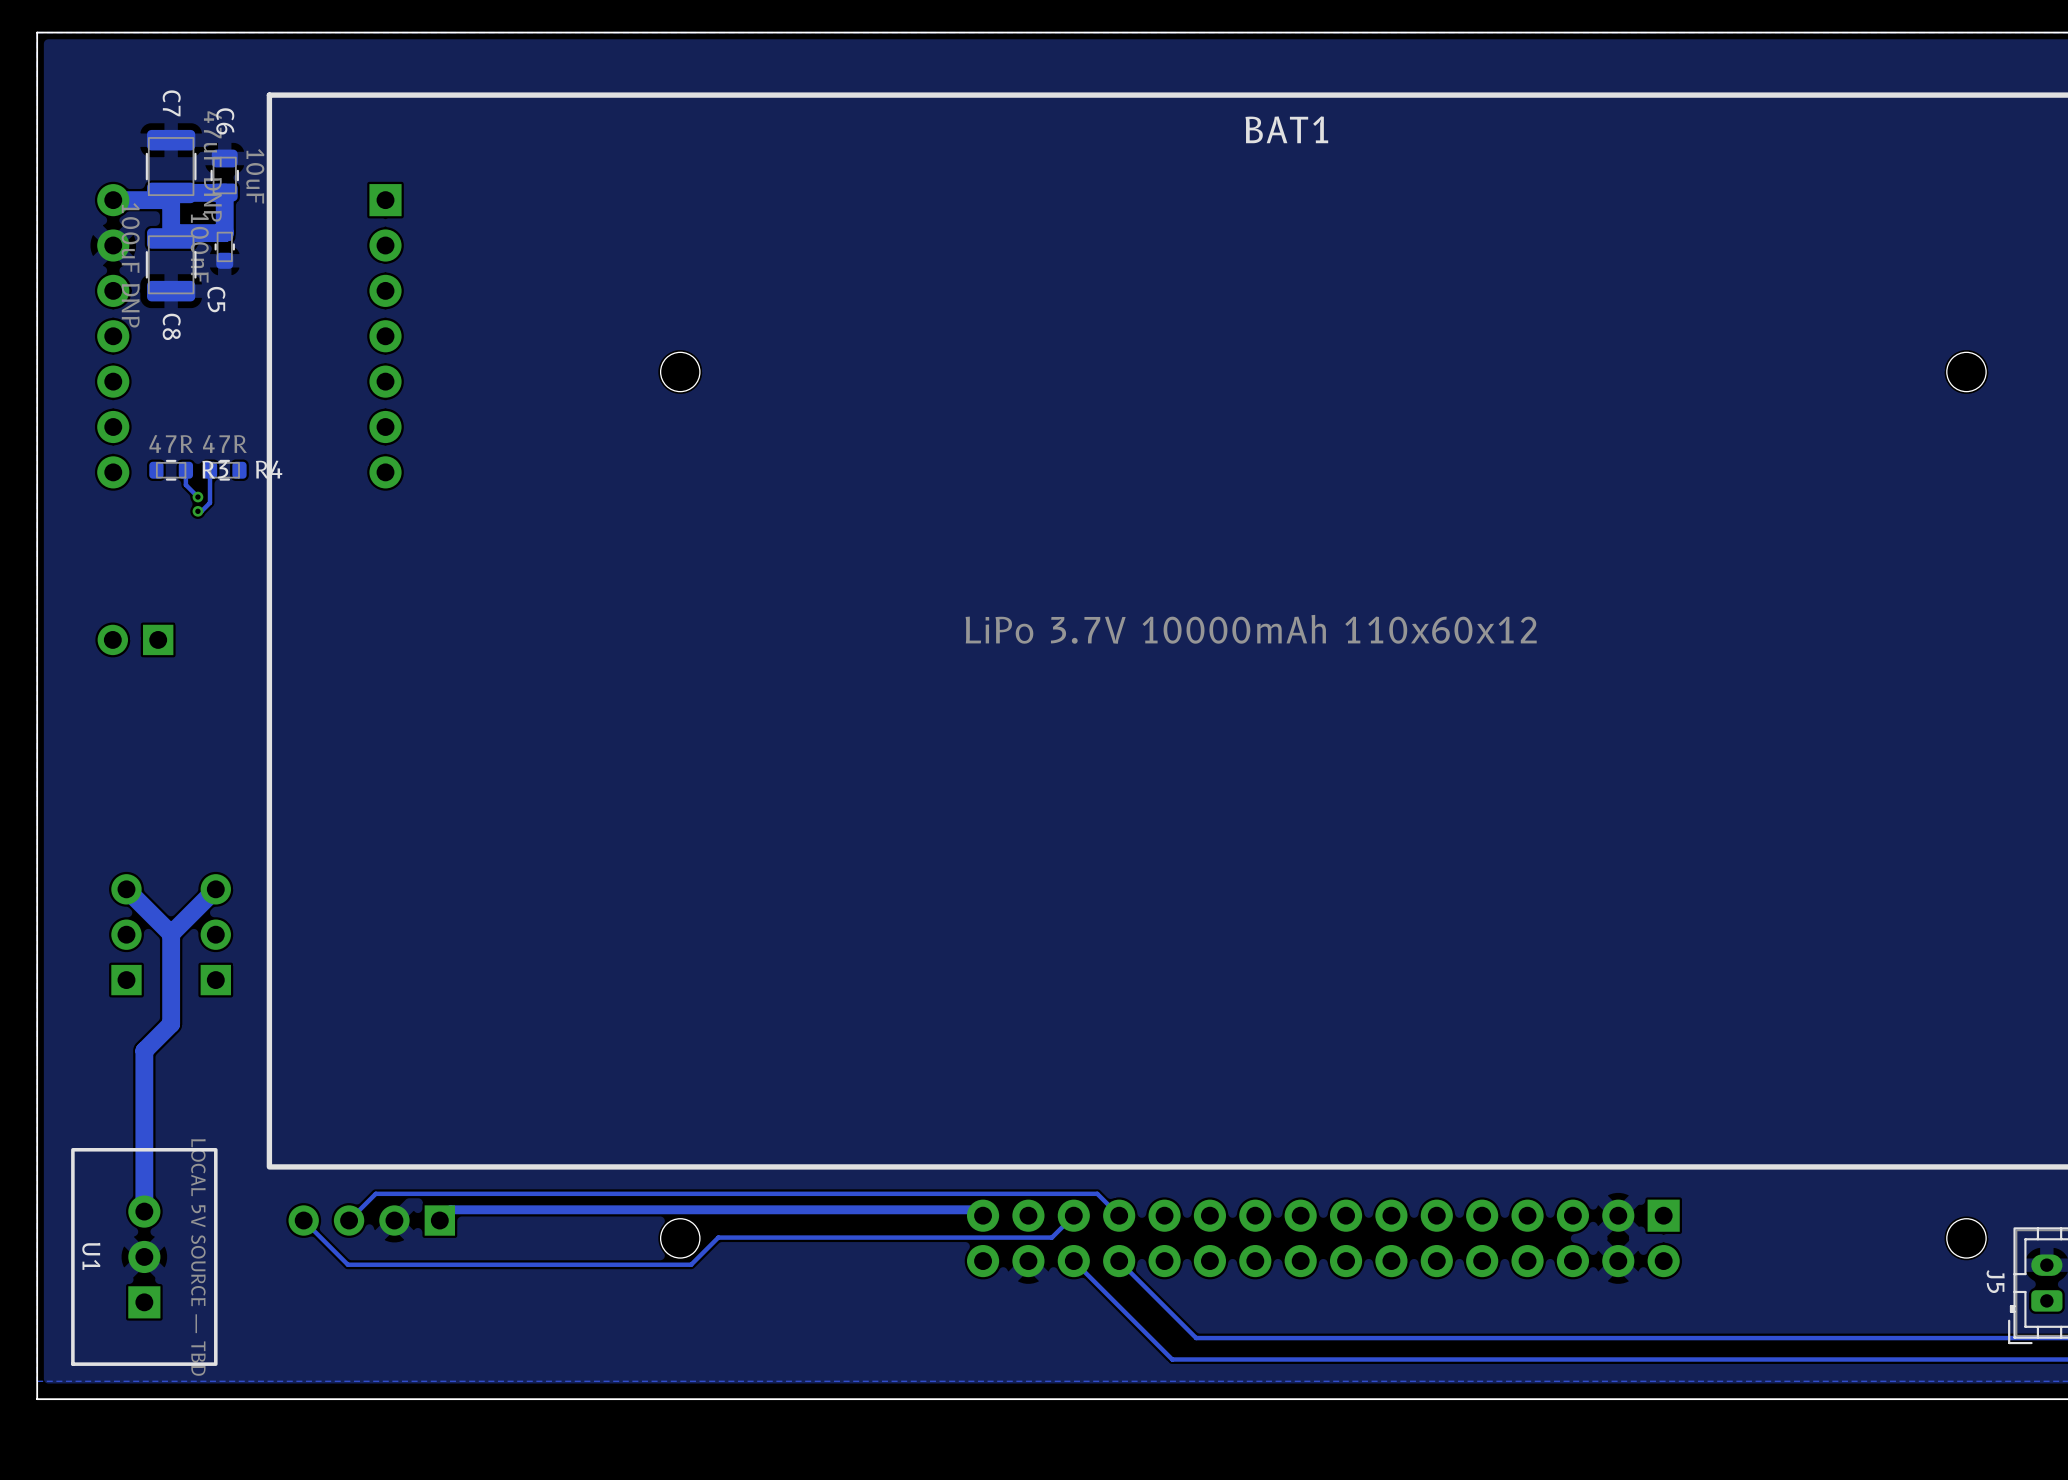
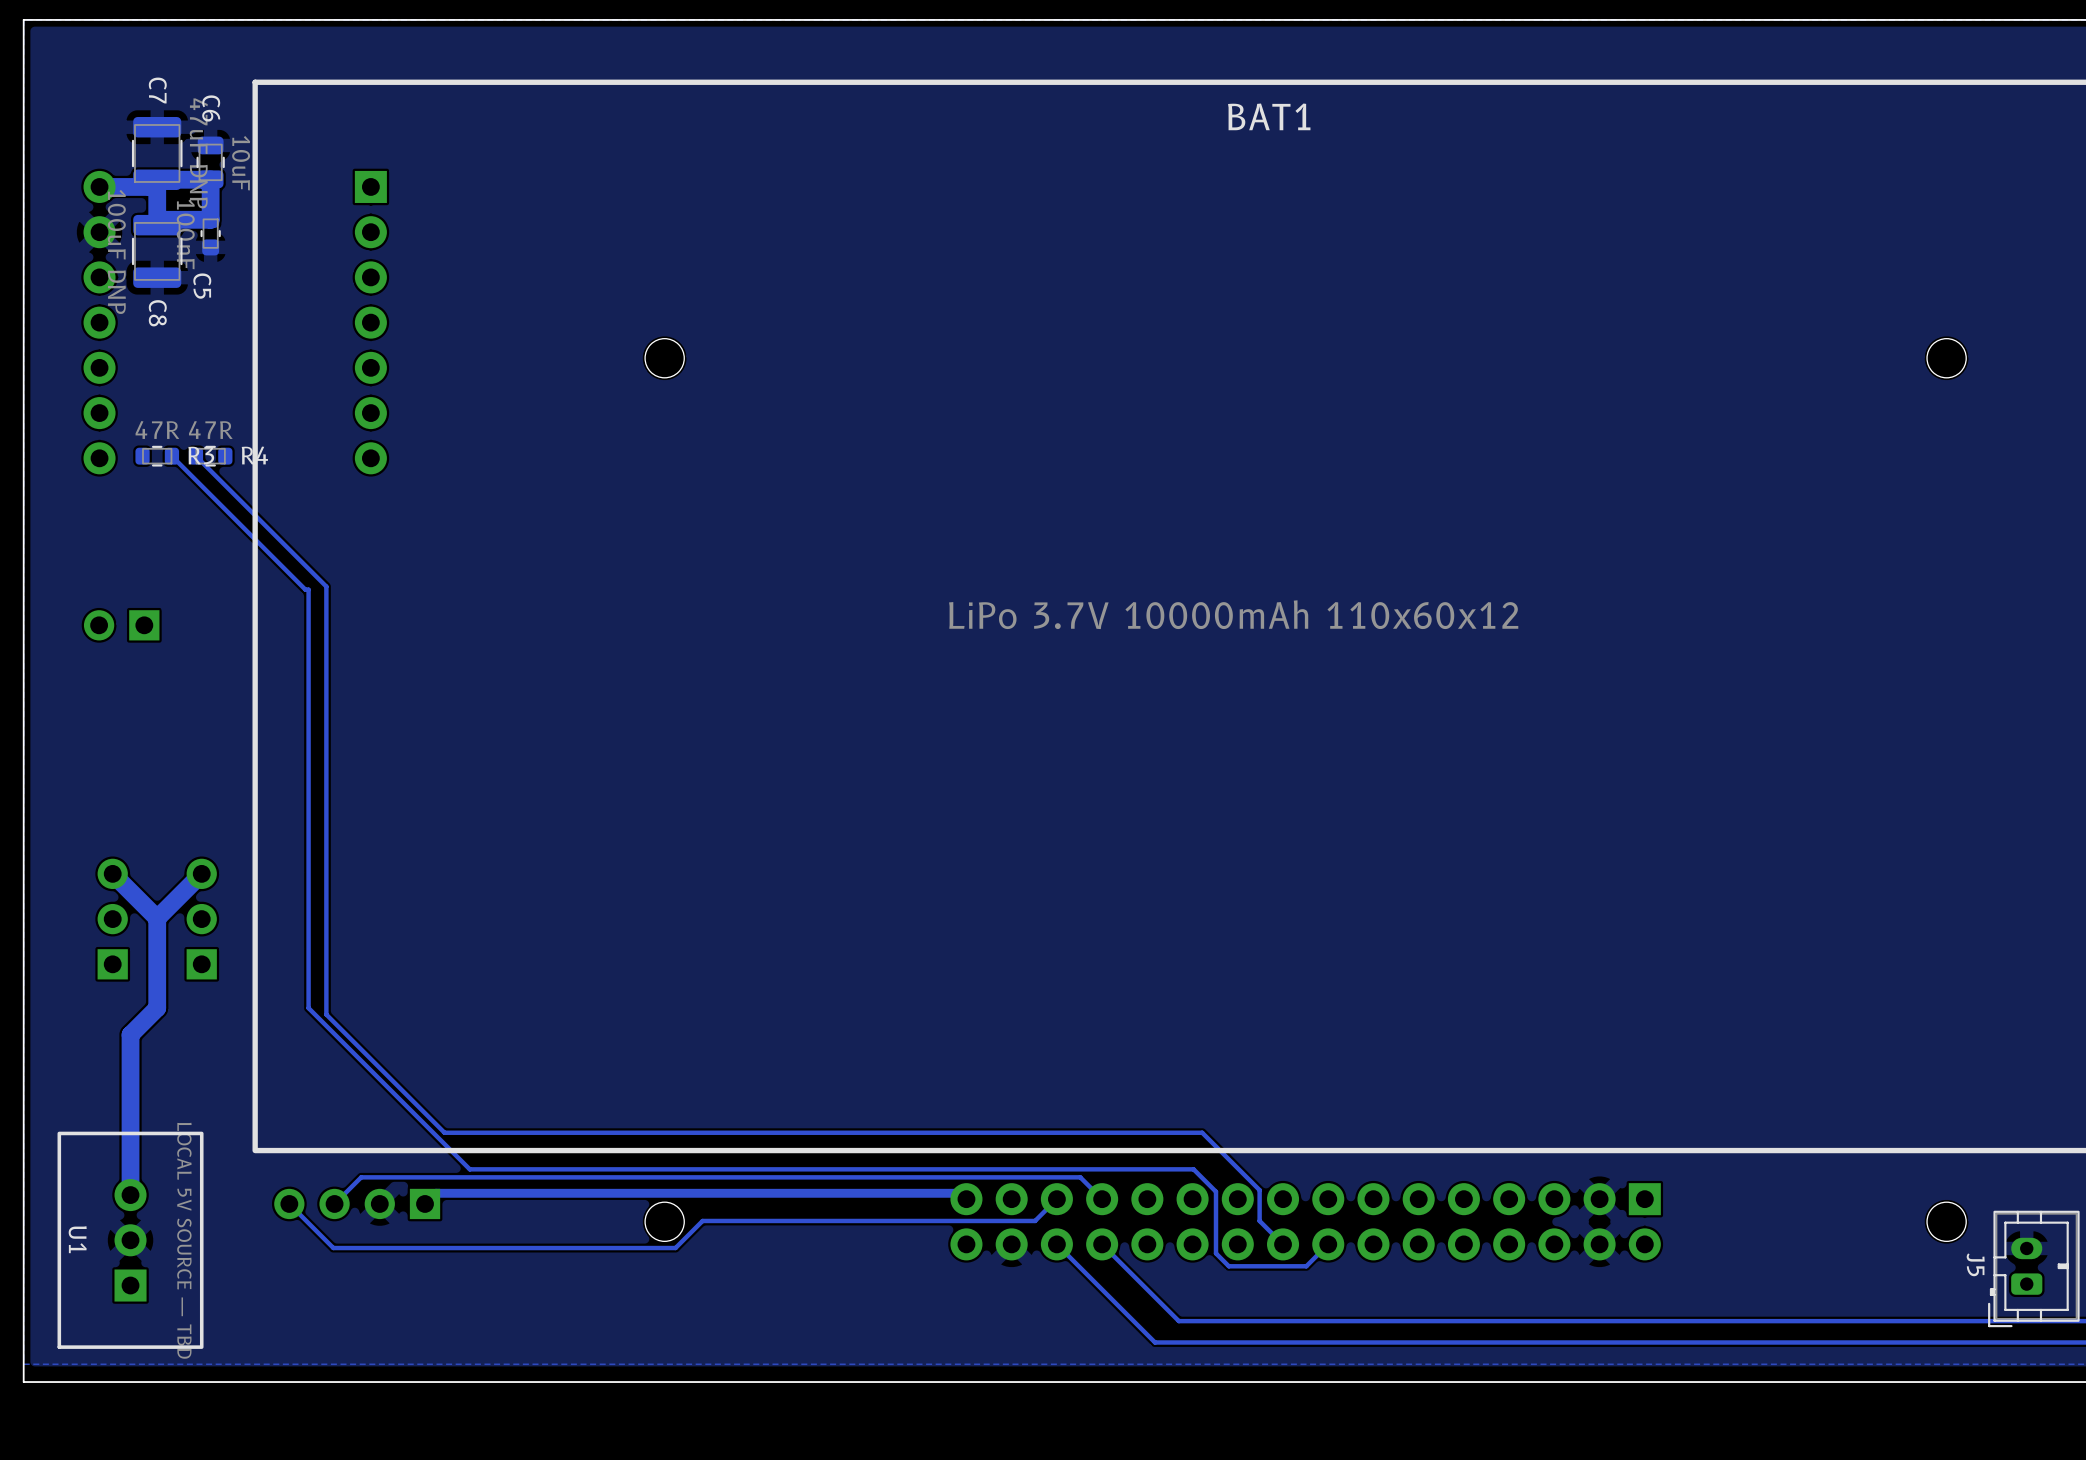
track: (185, 470) (185, 484) (197, 497) -> (171, 456) (305, 589) (308, 589) (308, 1008) (469, 1169) (1193, 1169) (1216, 1191) (1216, 1253) (1228, 1266) (1306, 1266) (1328, 1244)
track: (210, 470) (210, 502) (201, 511) (197, 511) -> (195, 456) (326, 586) (326, 1014) (444, 1132) (1202, 1132) (1259, 1190) (1259, 1220) (1283, 1244)
via: (197, 497) -> none
via: (197, 511) -> none

